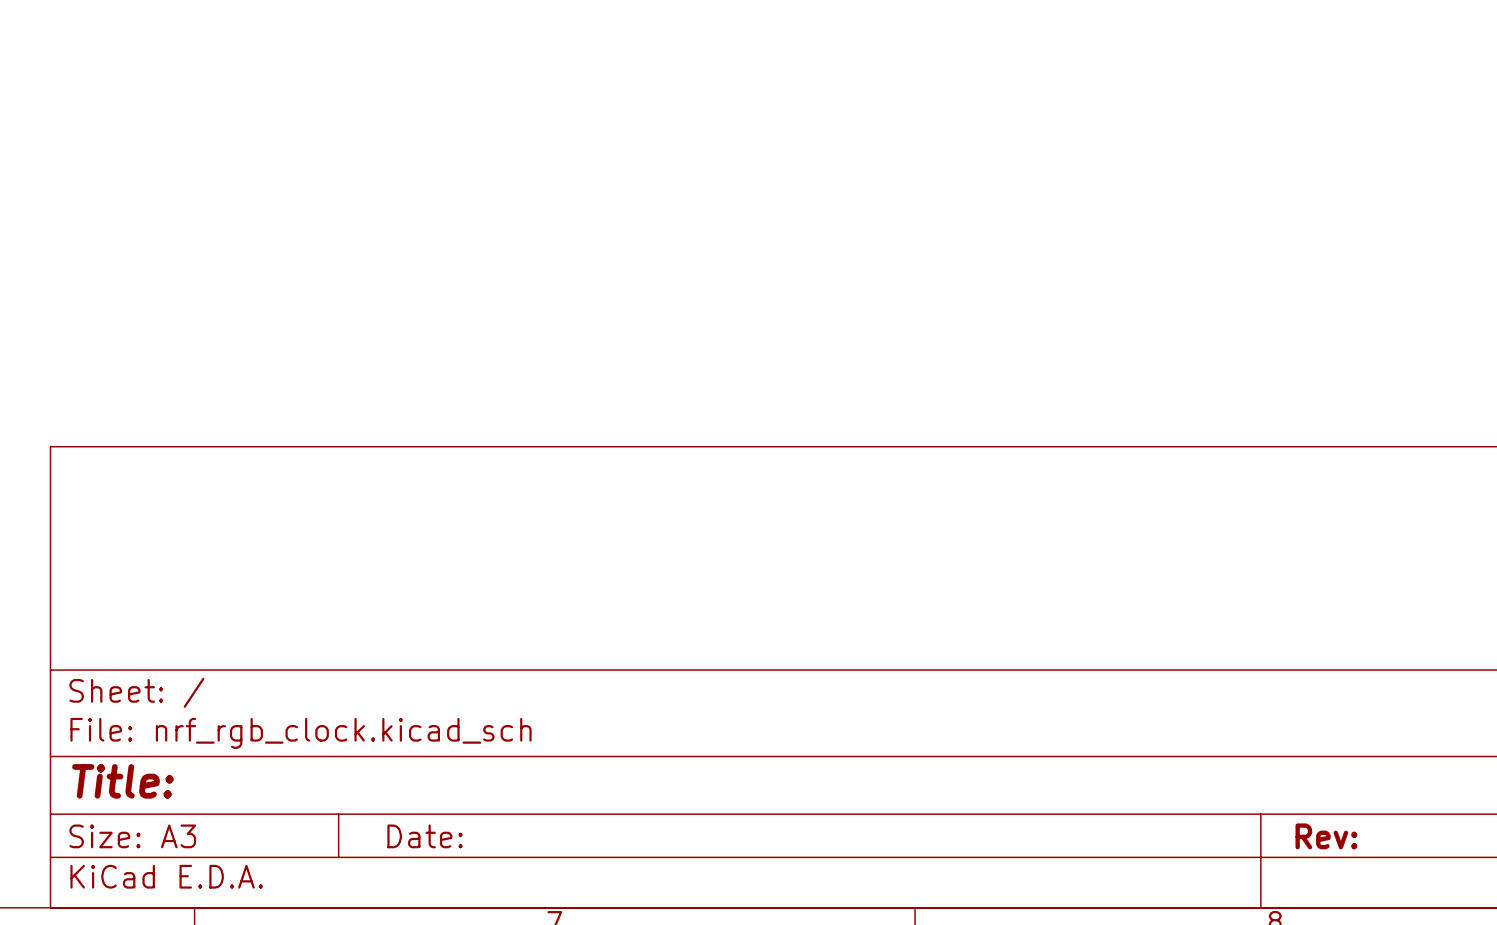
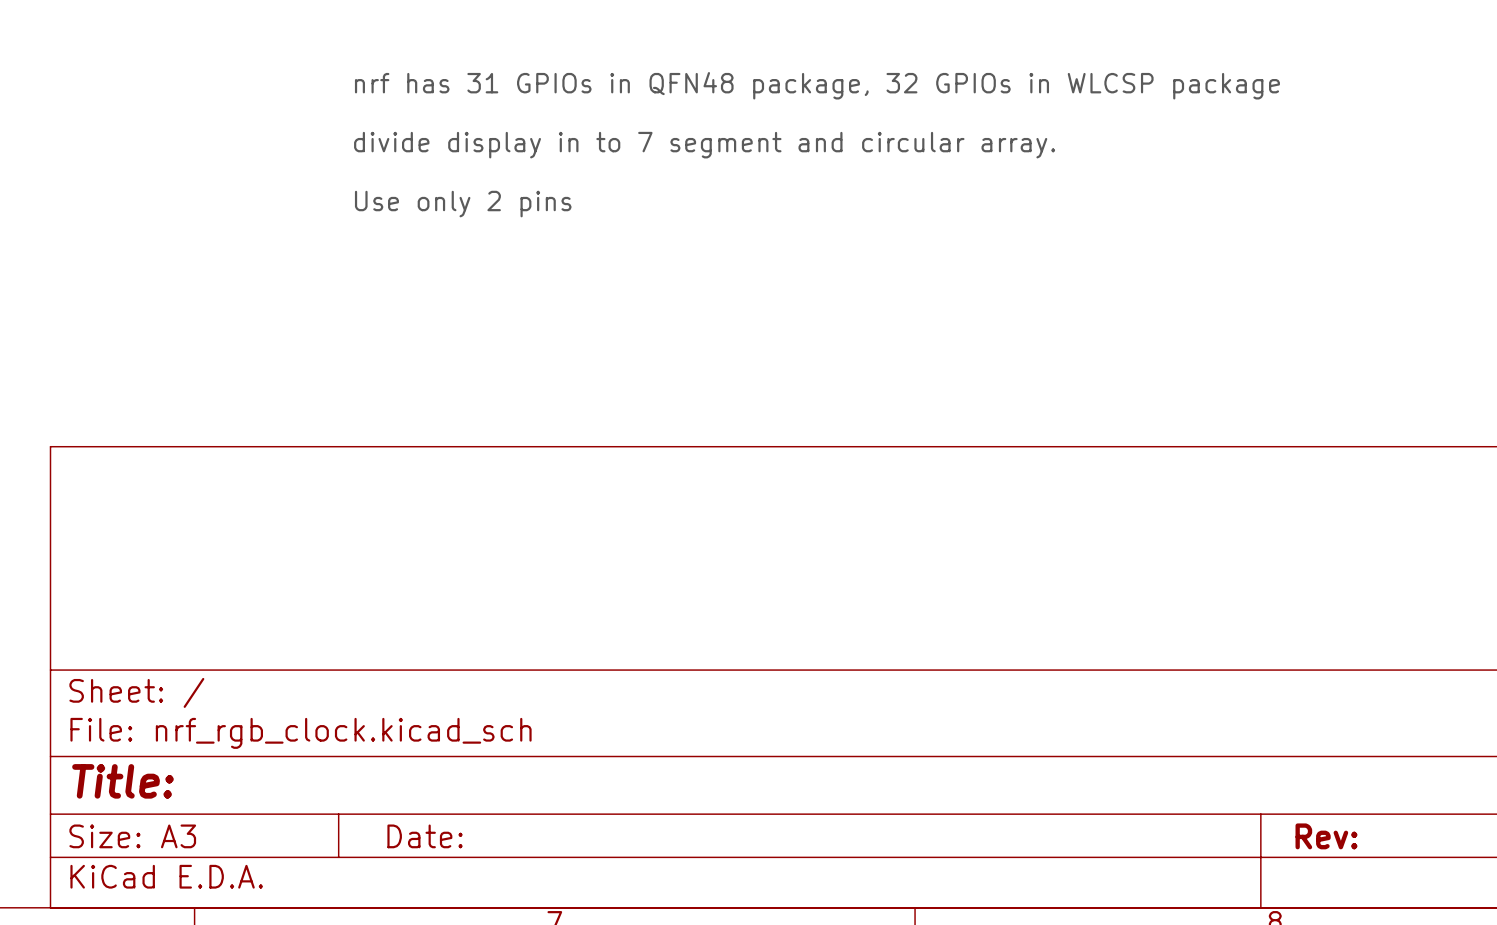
text: none -> nrf has 31 GPIOs in QFN48 package, 32 GPIOs in WLCSP package (817, 85)
text: none -> divide display in to 7 segment and circular array. (704, 145)
text: none -> Use only 2 pins (463, 204)

